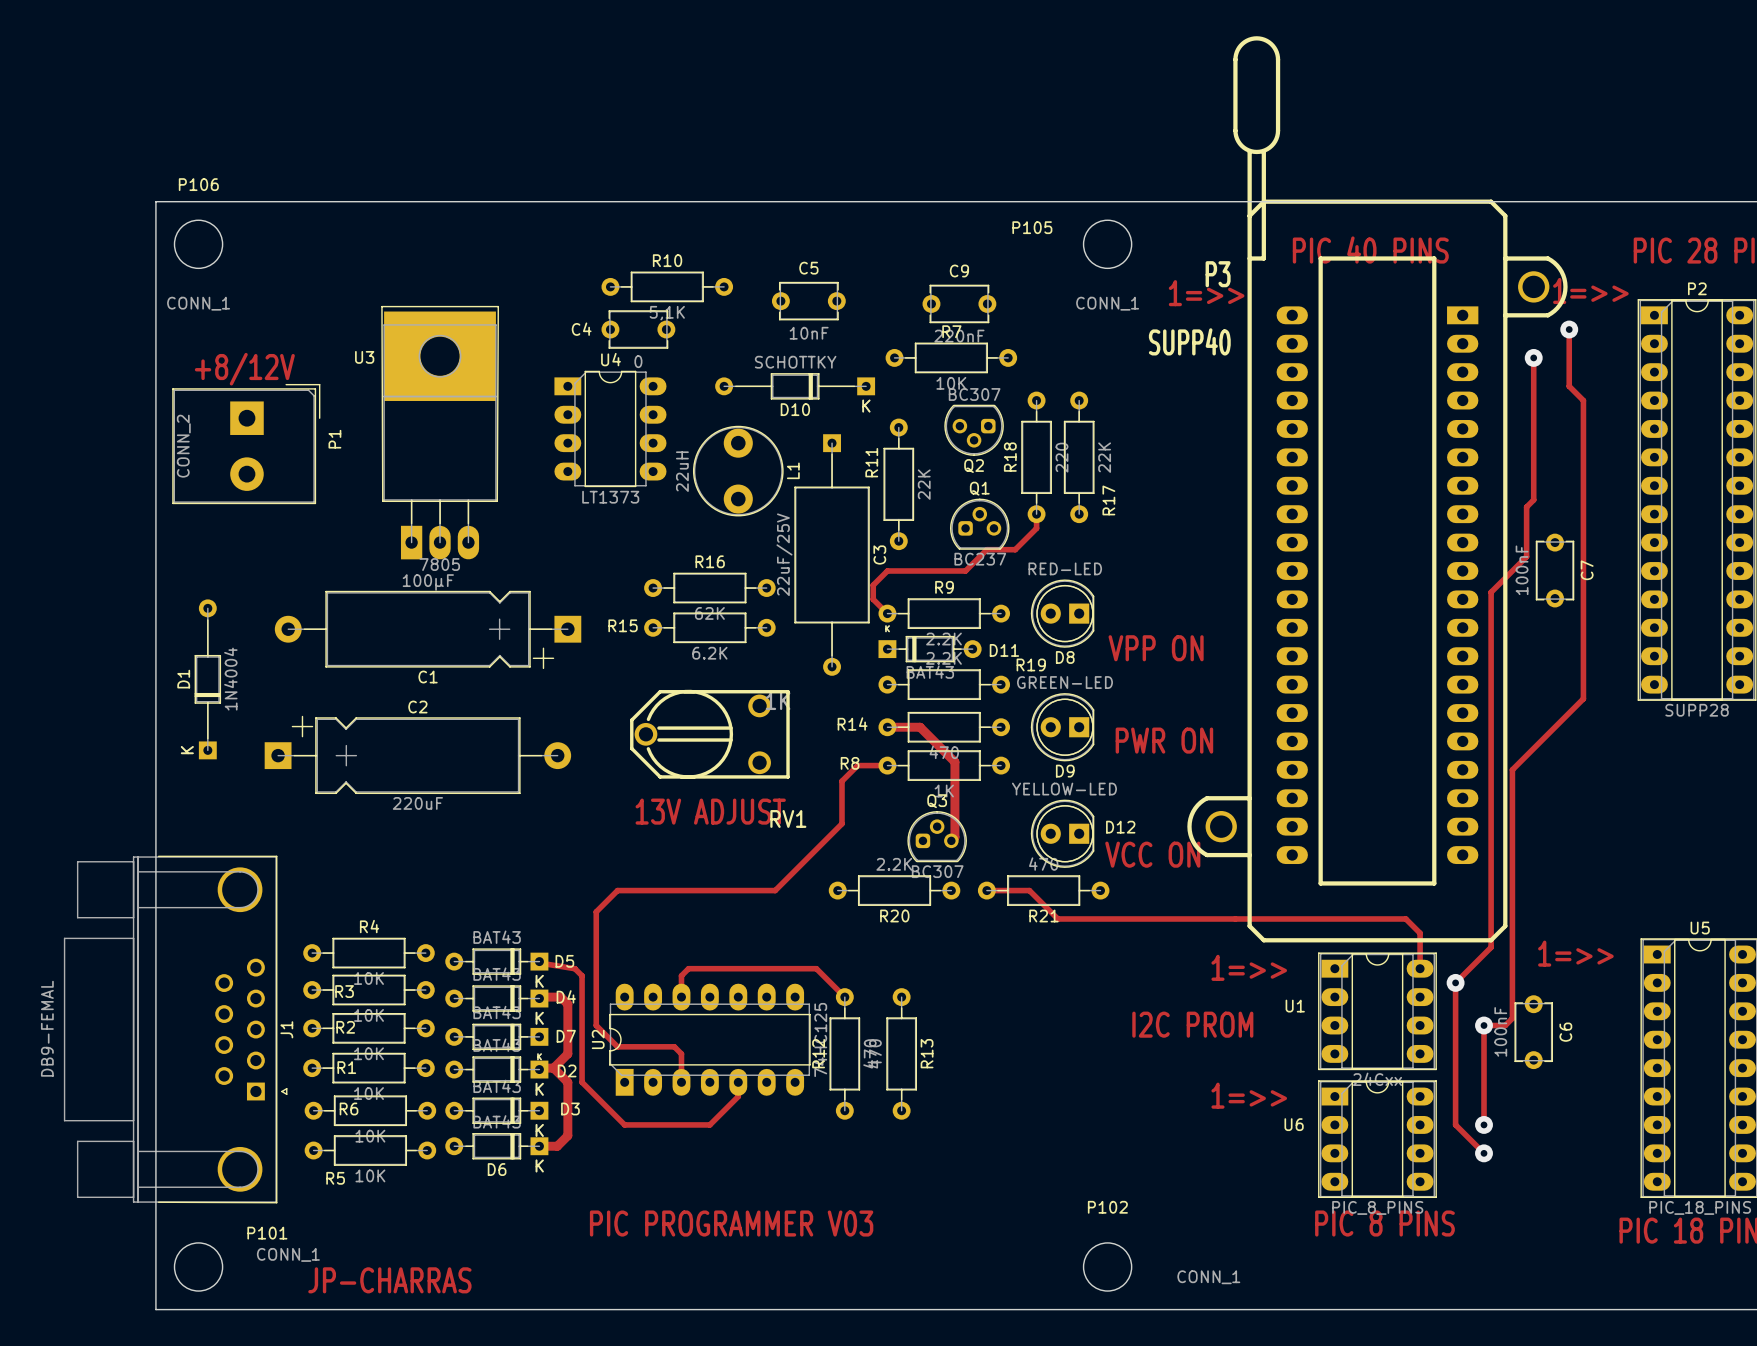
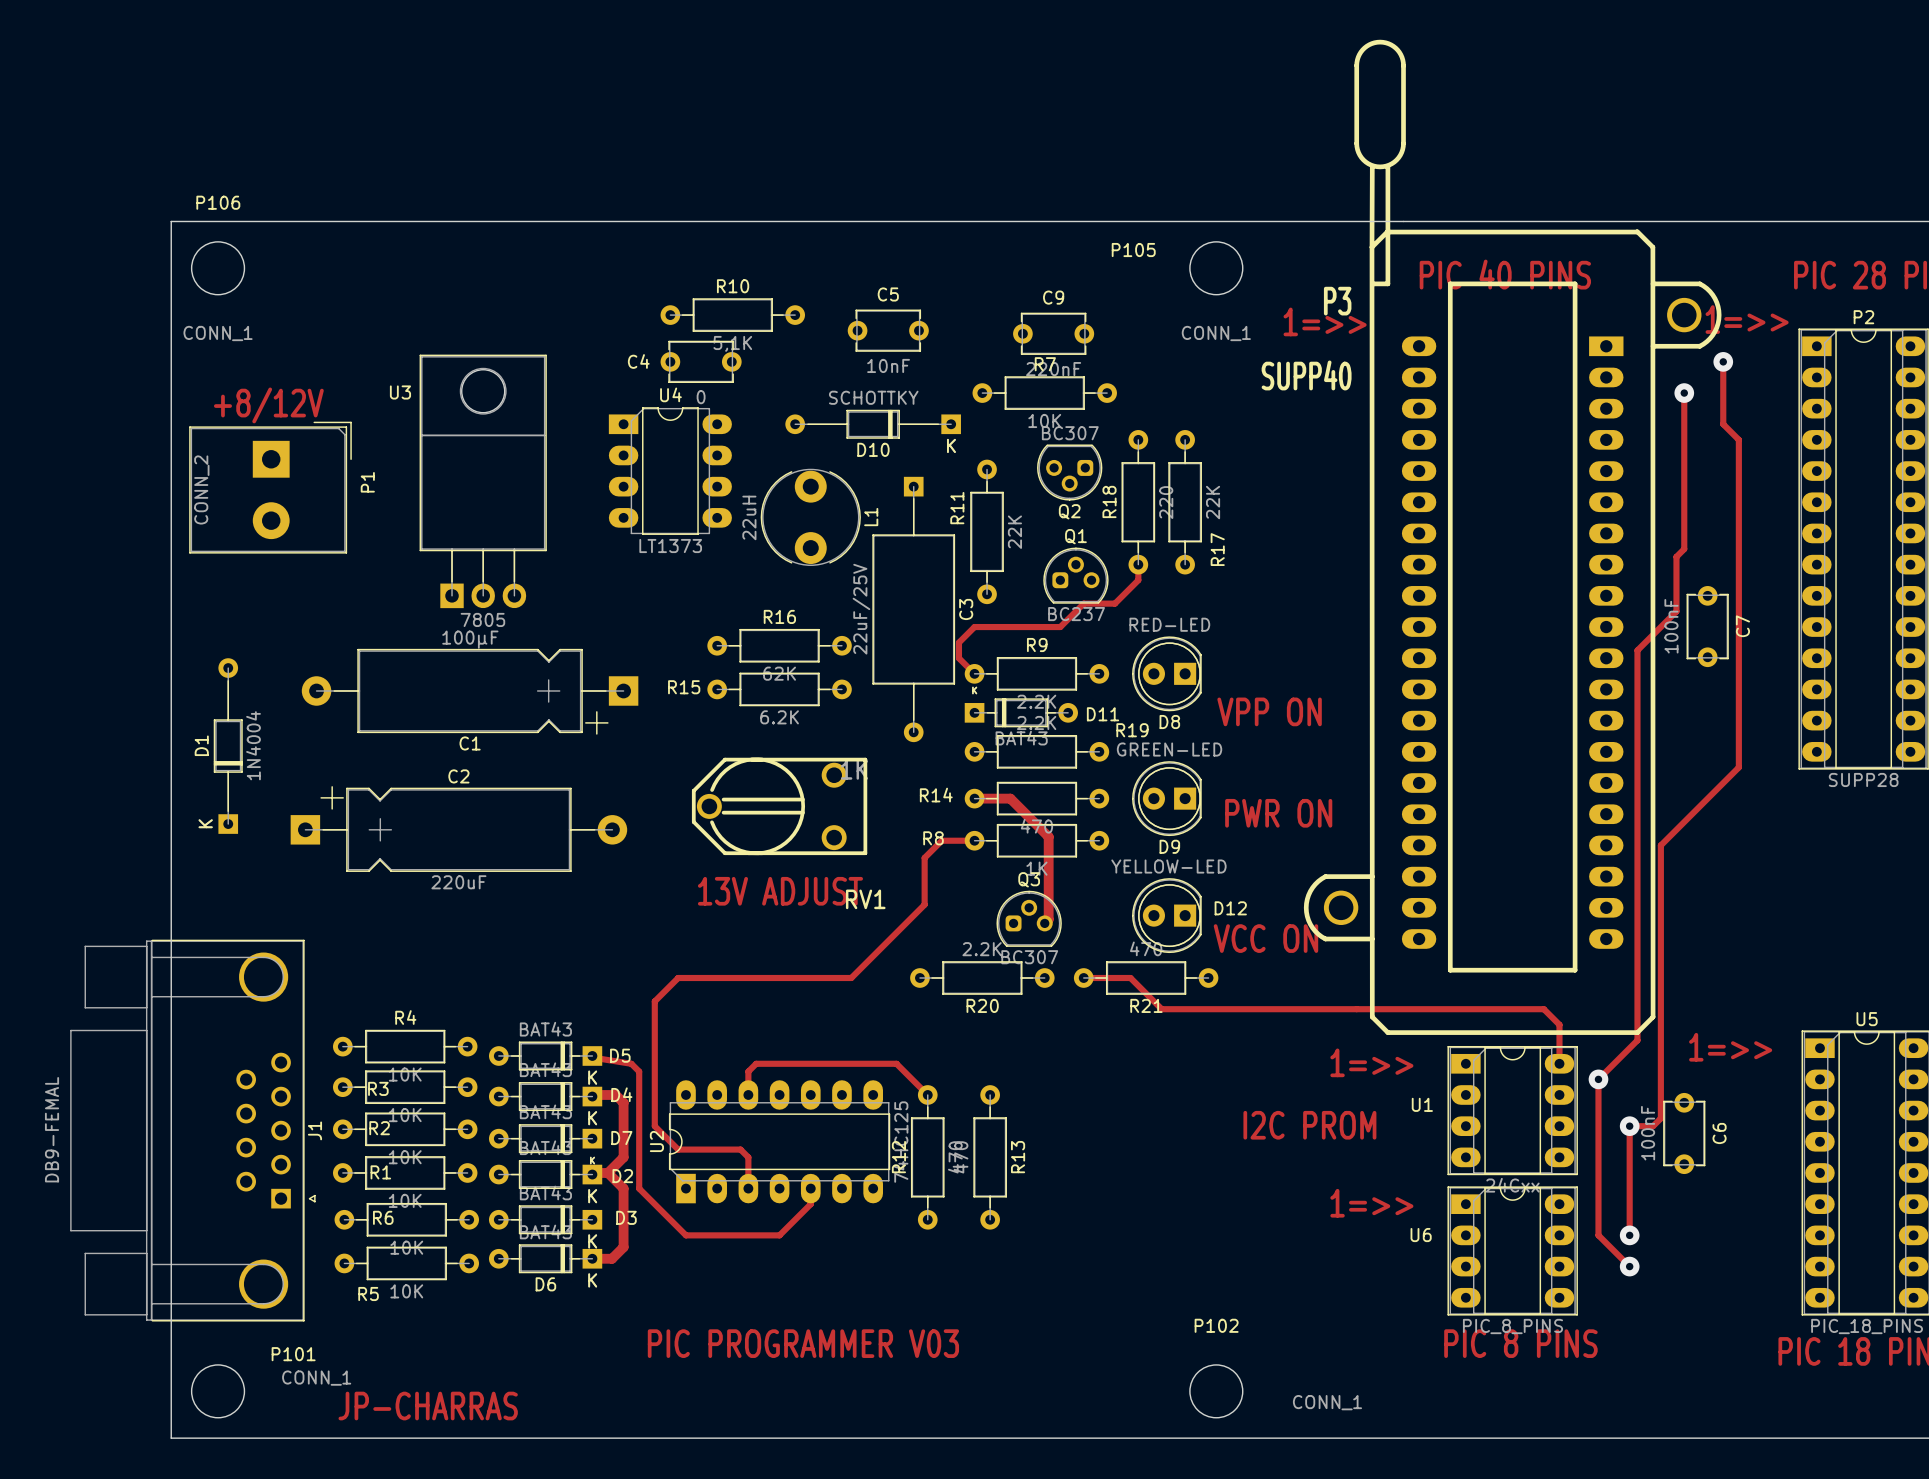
P3 footprint: [1187, 36, 1568, 943] -> [1303, 39, 1722, 1035]
U3 footprint: [381, 305, 499, 560] -> [419, 354, 547, 609]
L1 footprint: [693, 425, 784, 517] -> [760, 468, 861, 566]
J1 footprint: [64, 855, 288, 1204] -> [70, 939, 316, 1322]

